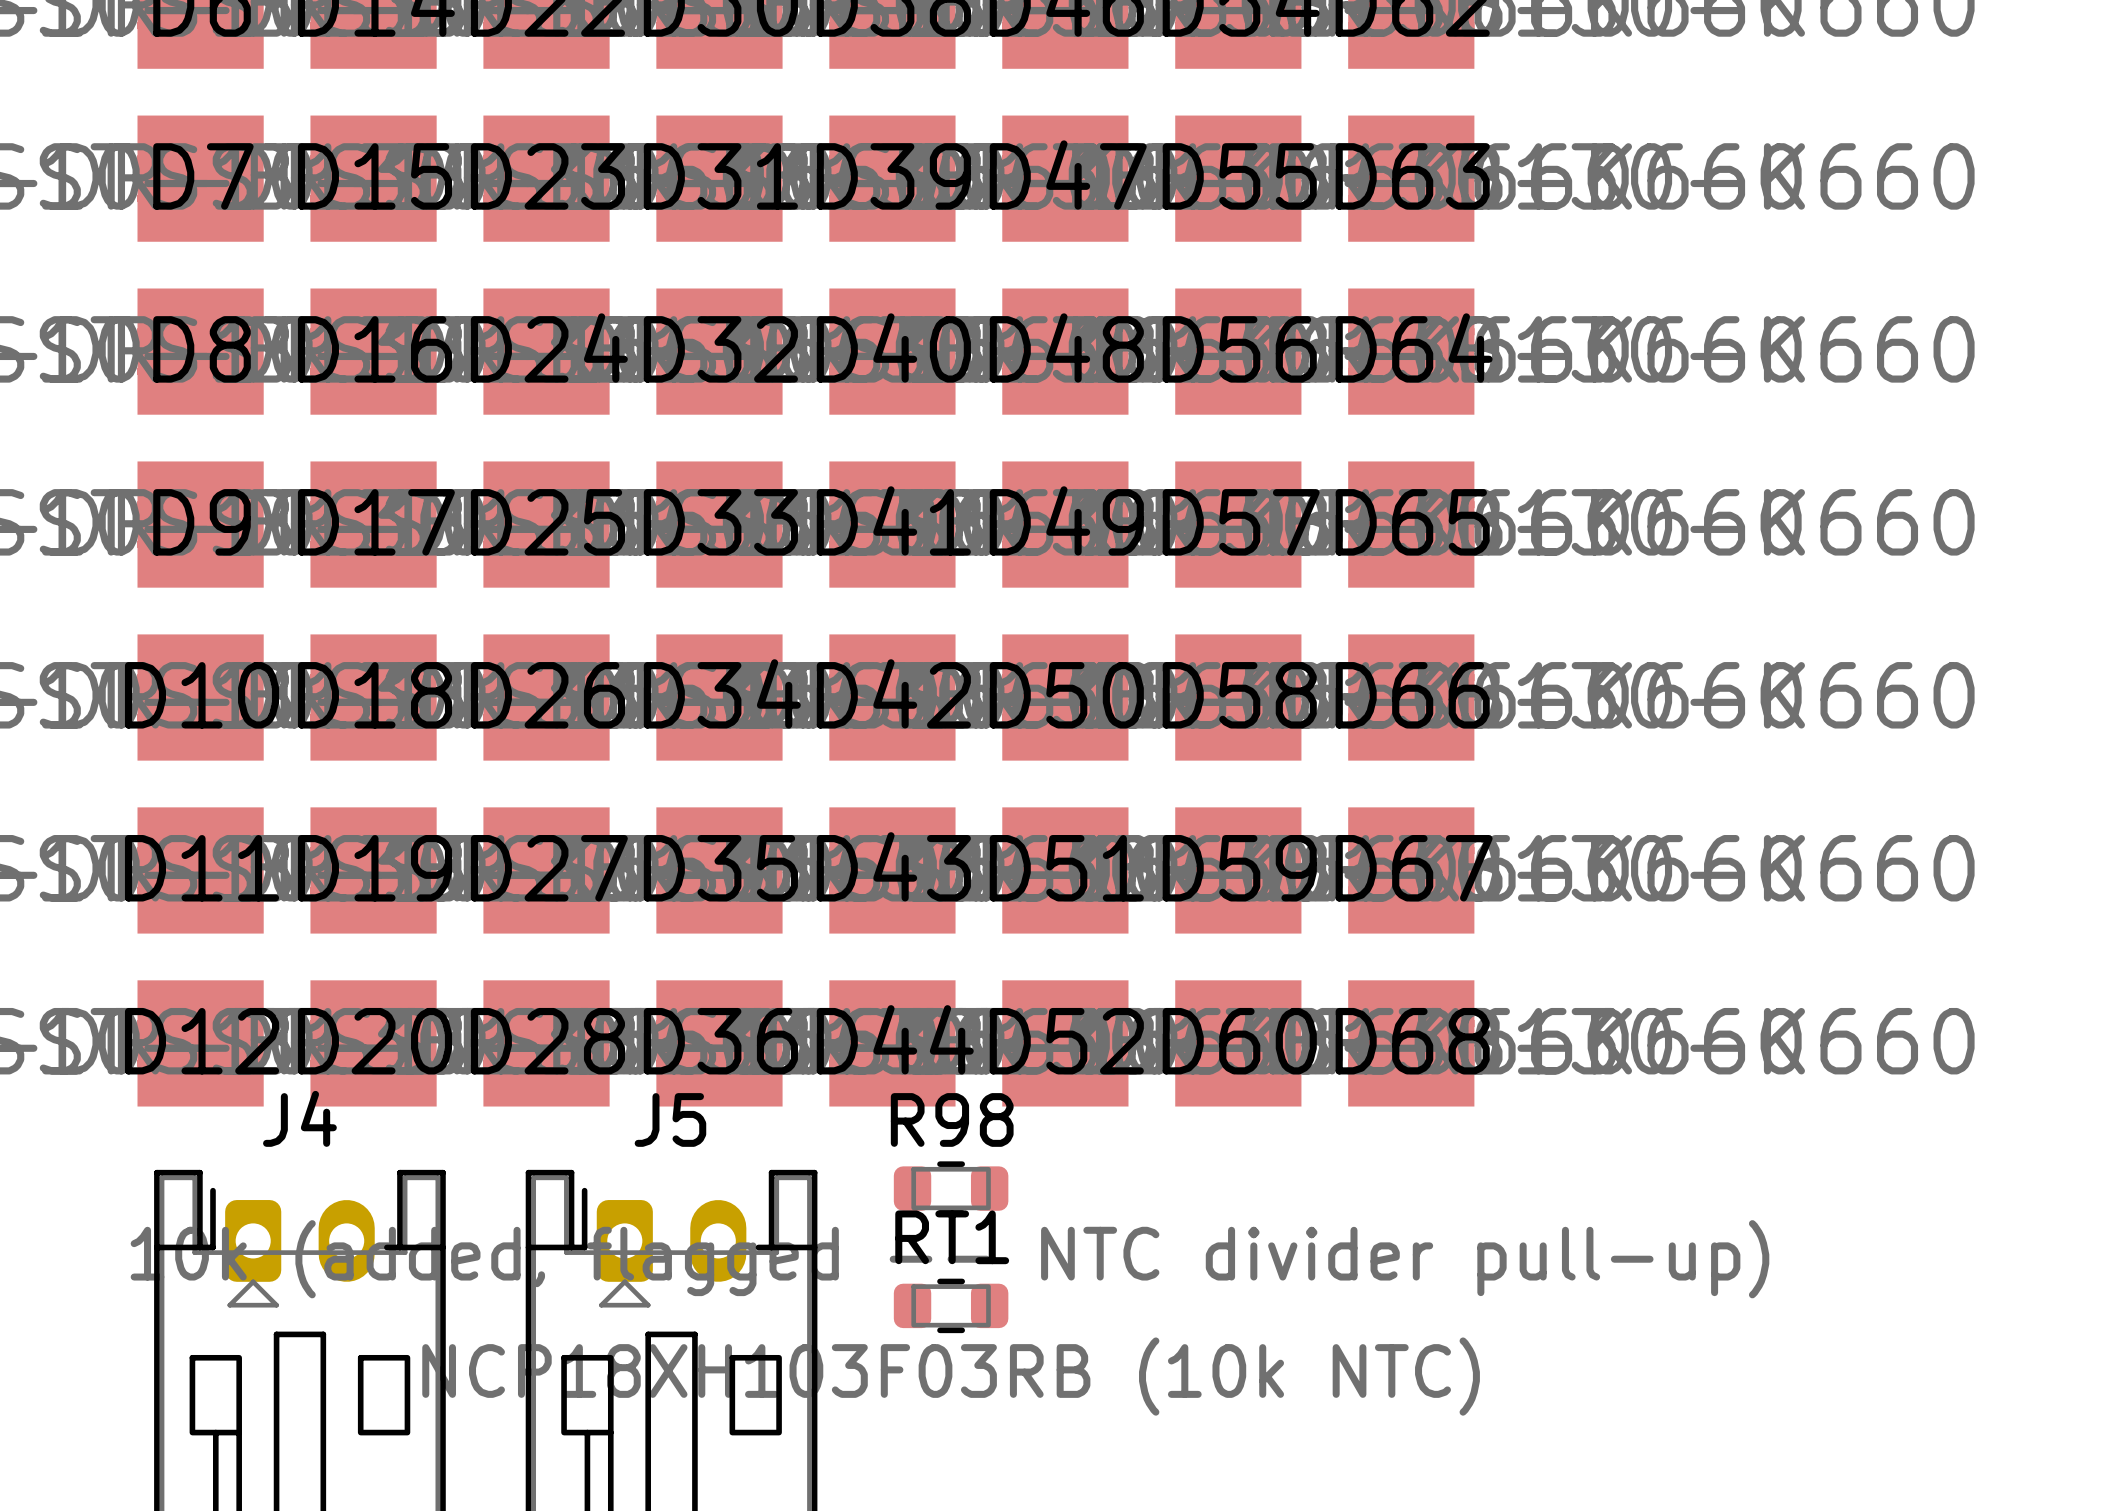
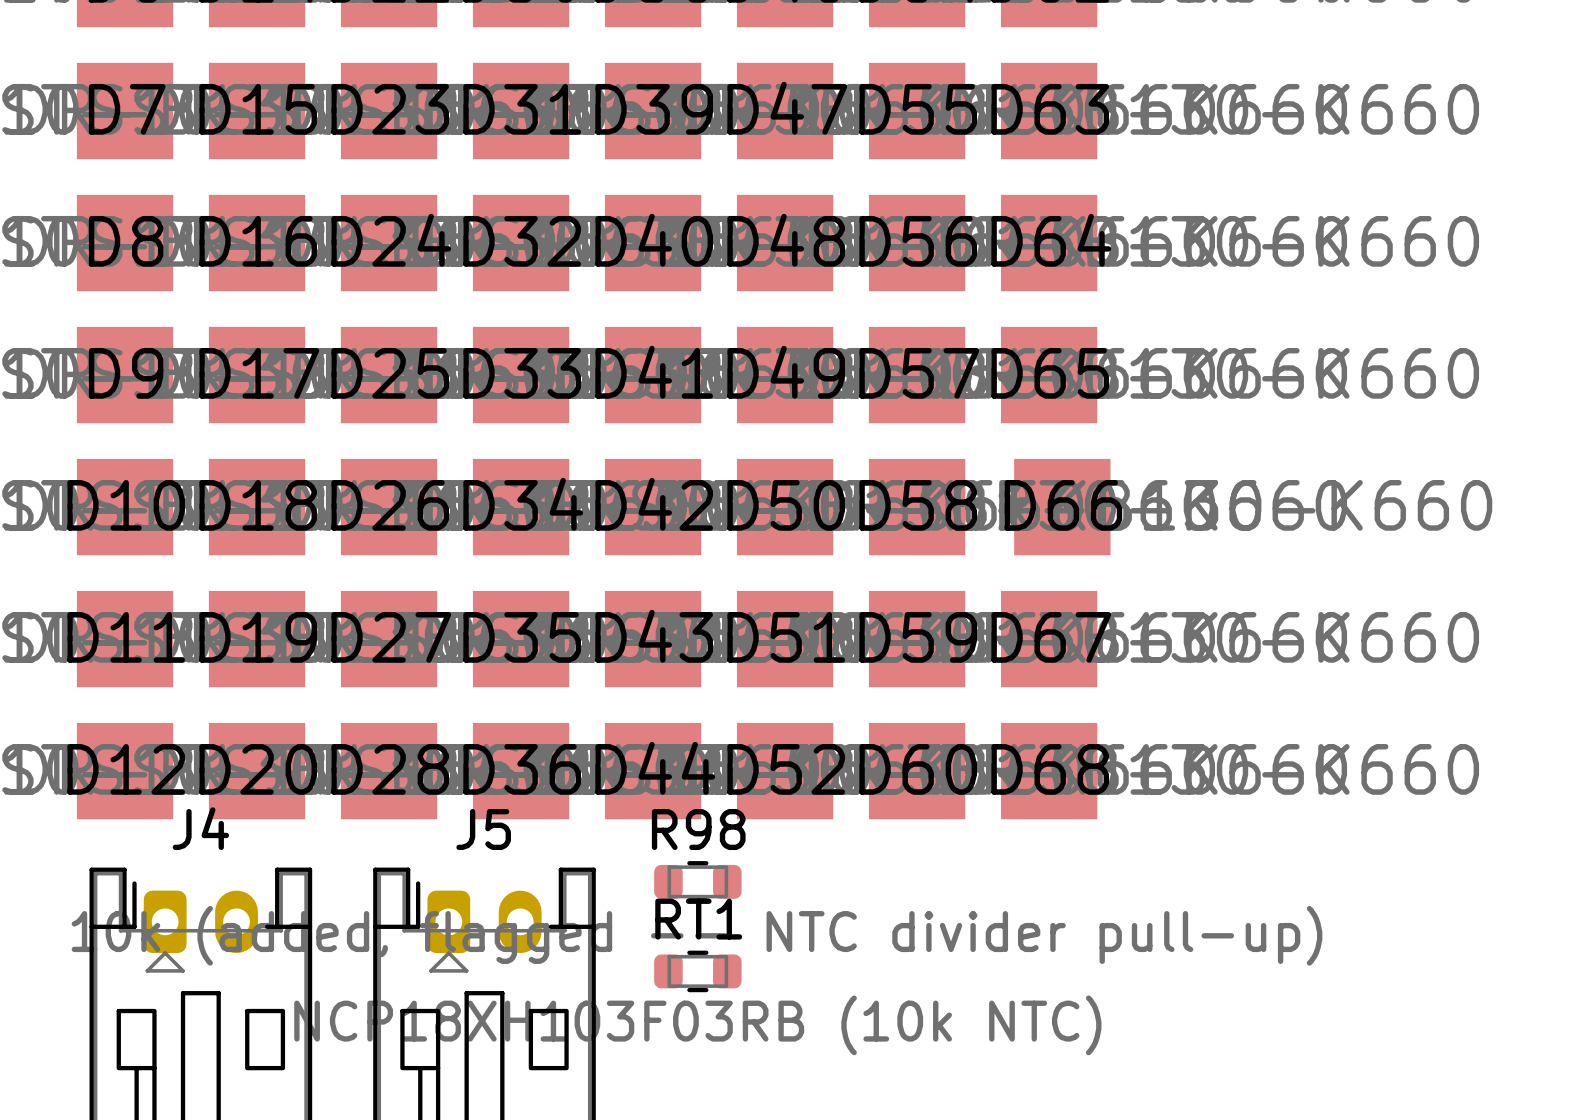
D66 position: (1411, 697) -> (1062, 507)

